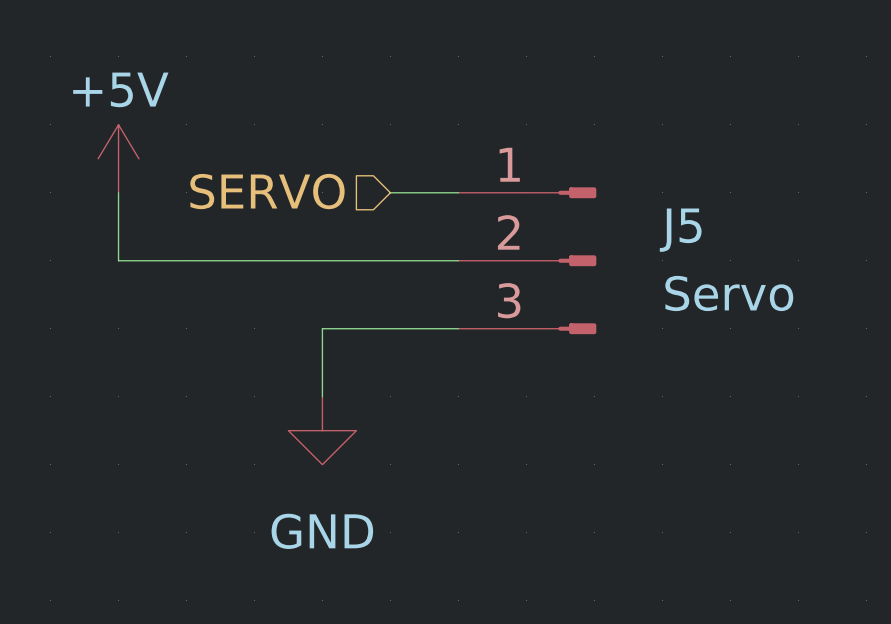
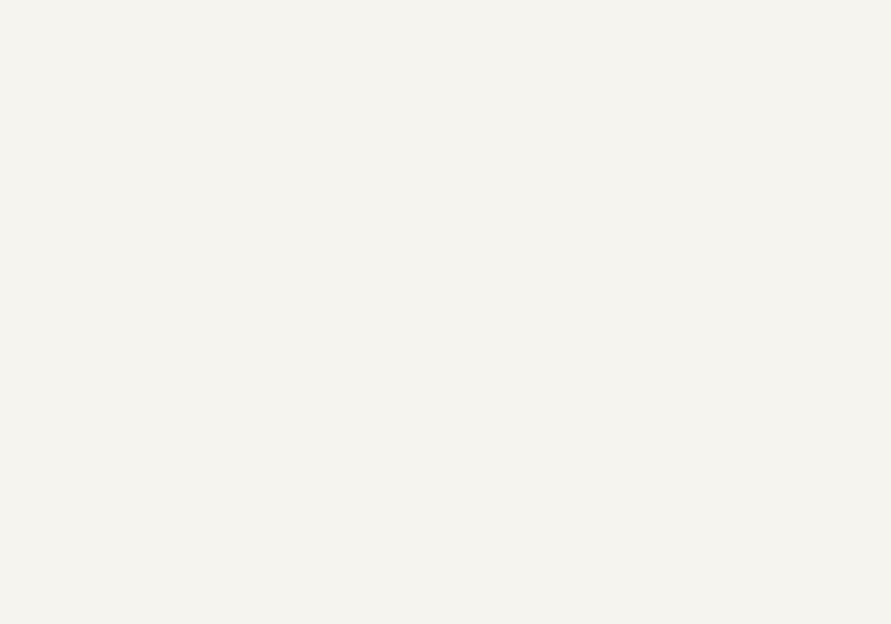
power symbol: +5V (118, 158) -> none
hierarchical label: SERVO (267, 191) -> none
wire: (118, 192) (118, 260) (458, 260) -> none
wire: (390, 192) (458, 192) -> none
J5: Servo (527, 260) -> none
wire: (458, 328) (322, 328) (322, 396) -> none
power symbol: GND (322, 430) -> none

